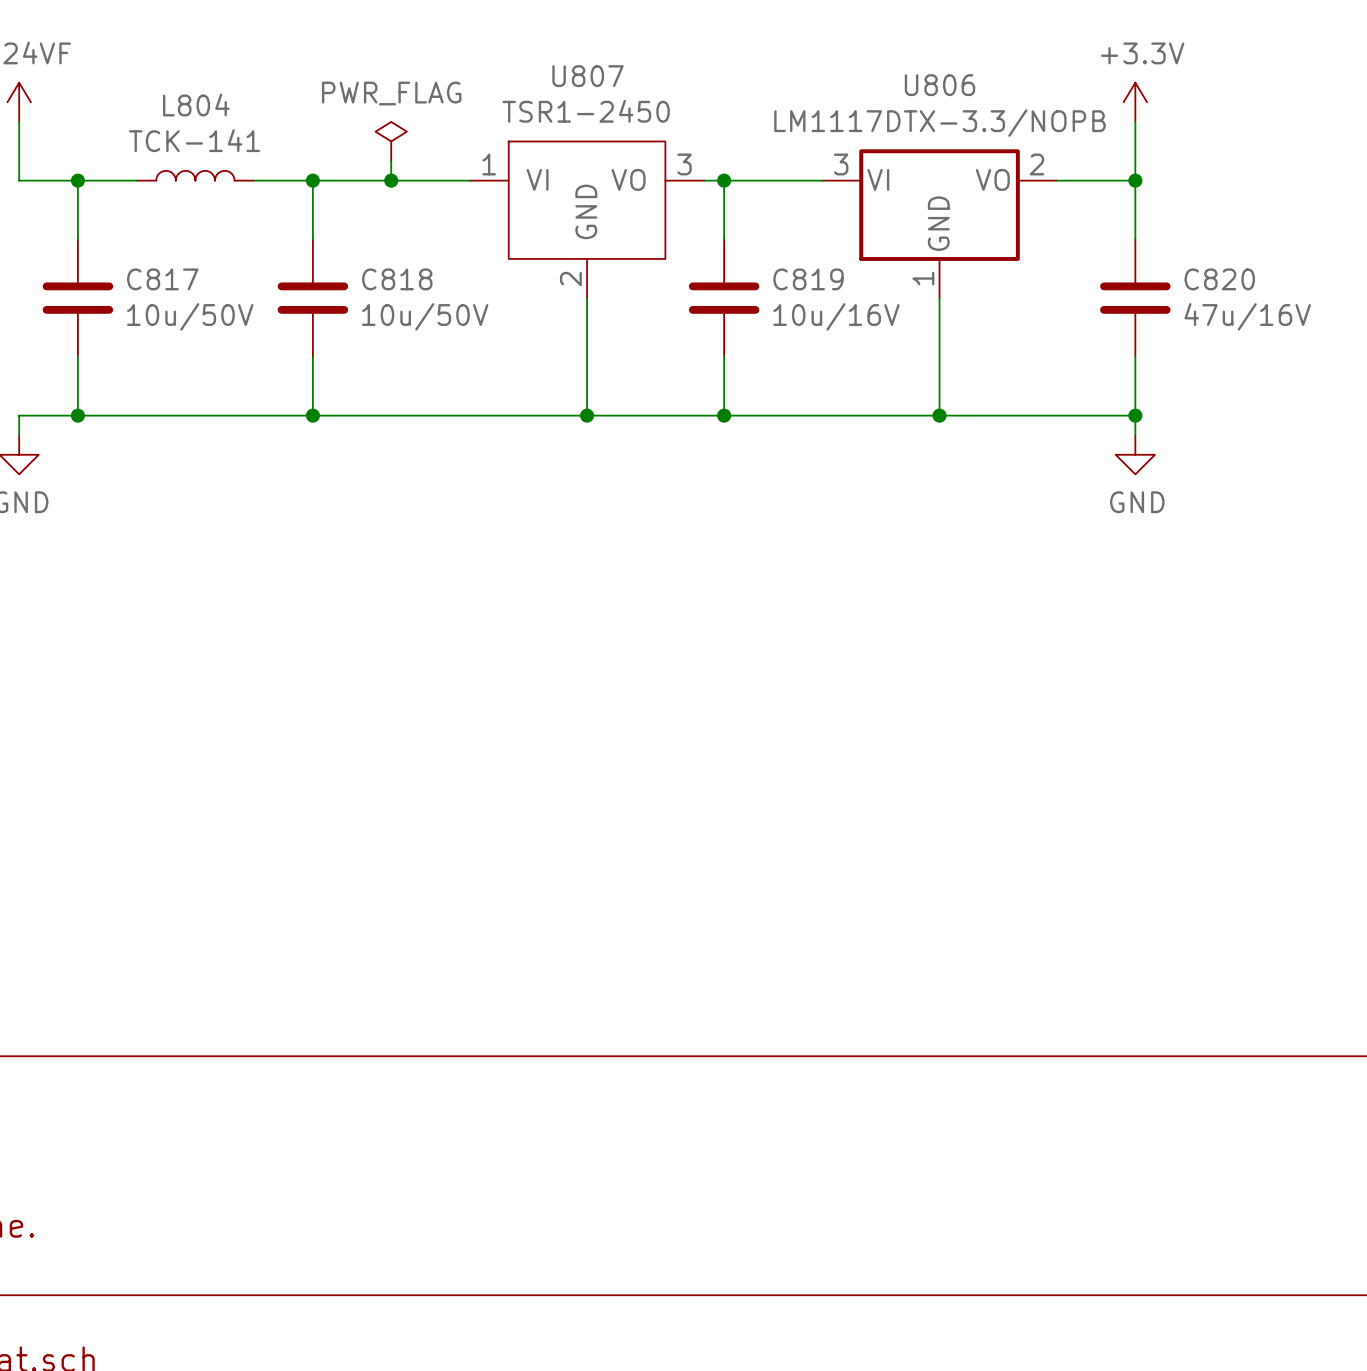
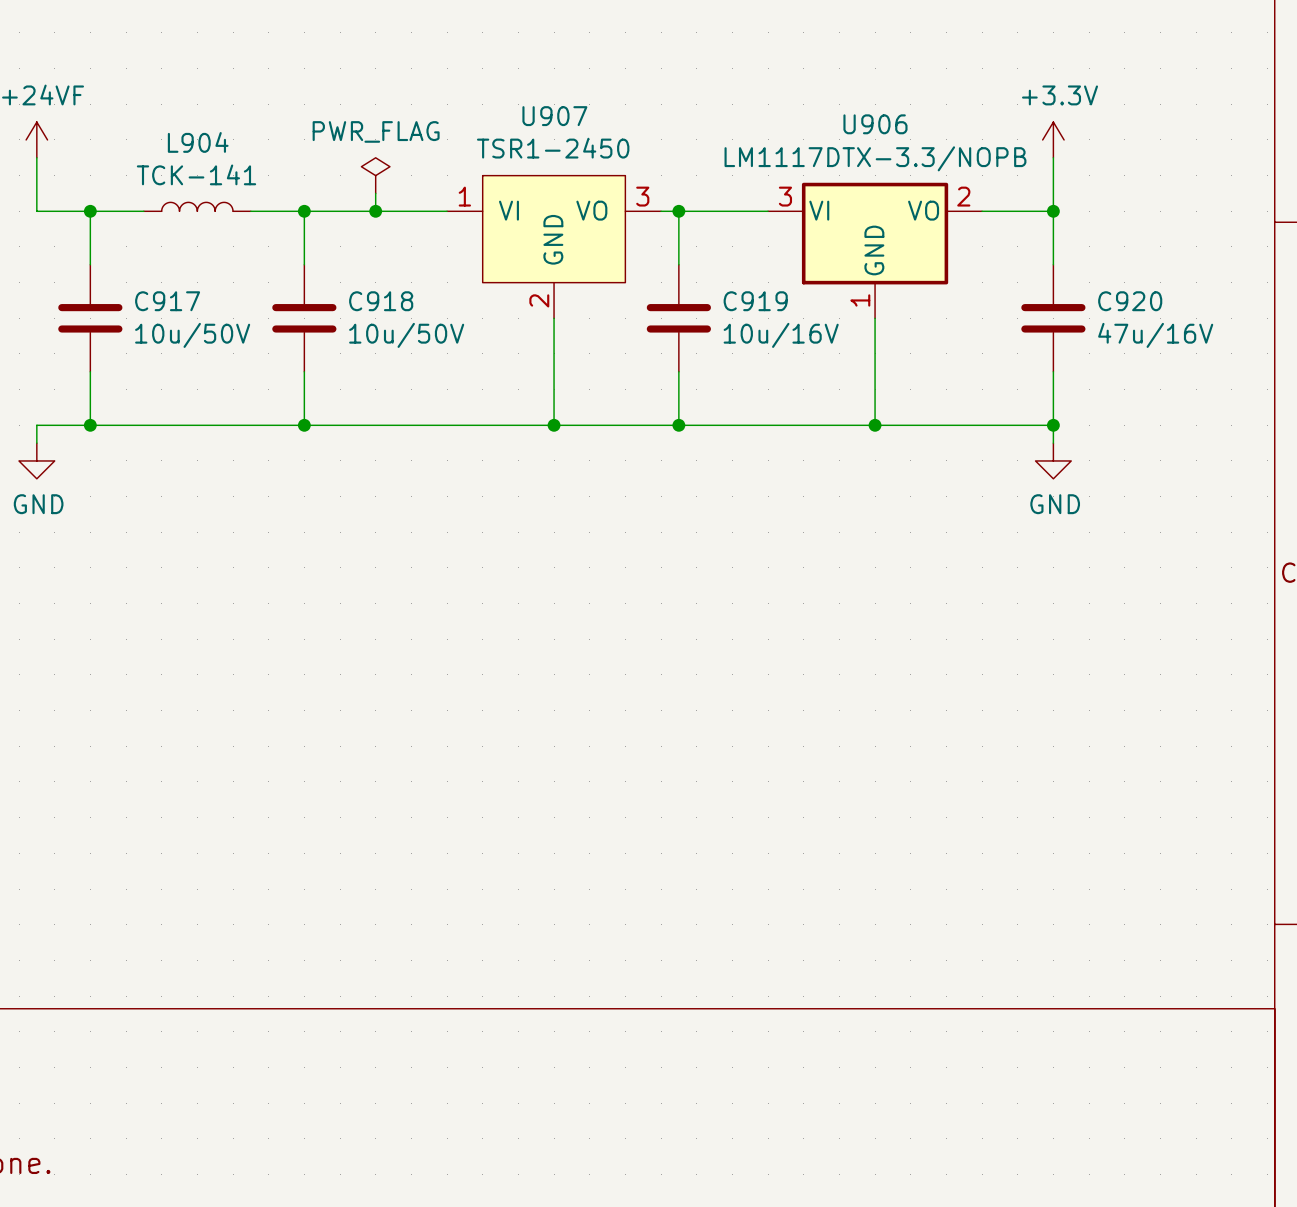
U807 name: U807 (587, 76) -> U907 (554, 116)
U806 name: U806 (940, 85) -> U906 (875, 124)
L804 name: L804 (196, 105) -> L904 (198, 142)
C817 name: C817 (162, 279) -> C917 (167, 301)
C818 name: C818 (397, 279) -> C918 (381, 301)
C819 name: C819 (808, 279) -> C919 (755, 301)
C820 name: C820 (1219, 279) -> C920 (1130, 301)

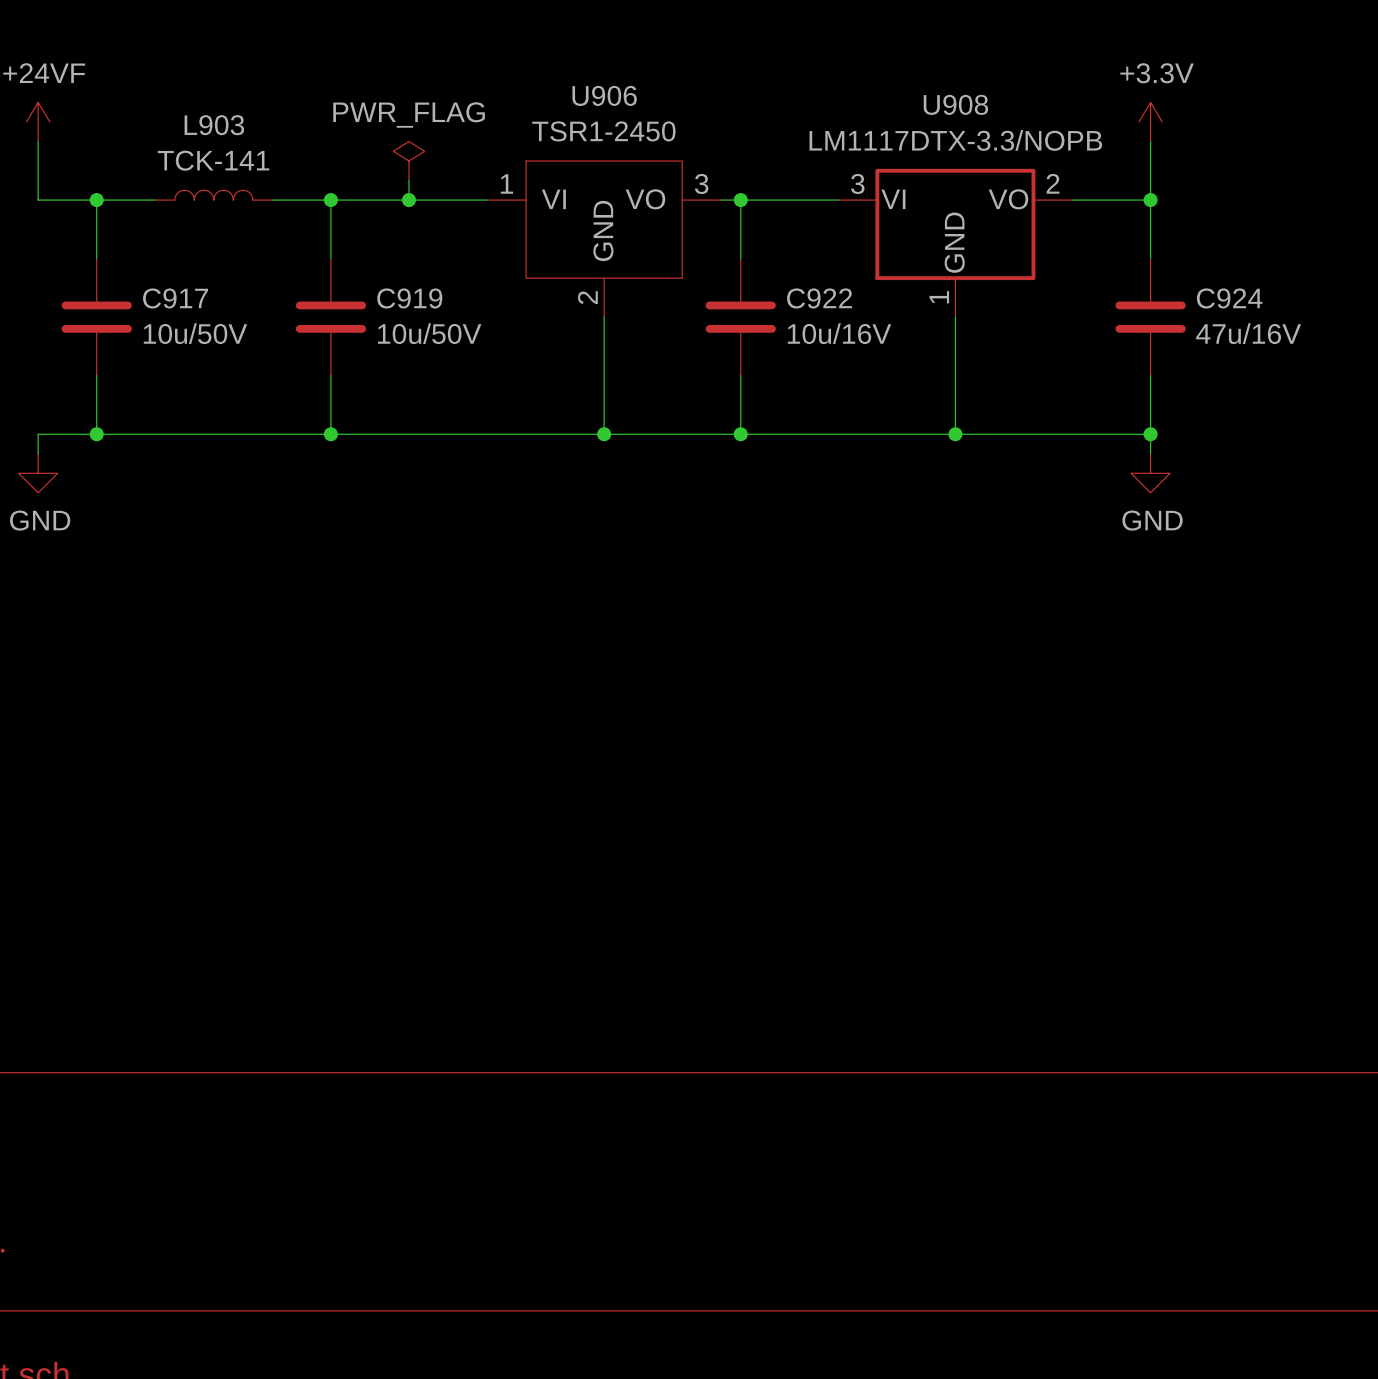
U907 name: U907 (554, 116) -> U906 (604, 95)
U906 name: U906 (875, 124) -> U908 (955, 104)
L904 name: L904 (198, 142) -> L903 (214, 125)
C918 name: C918 (381, 301) -> C919 (409, 298)
C919 name: C919 (755, 301) -> C922 (819, 298)
C920 name: C920 (1130, 301) -> C924 (1229, 298)

